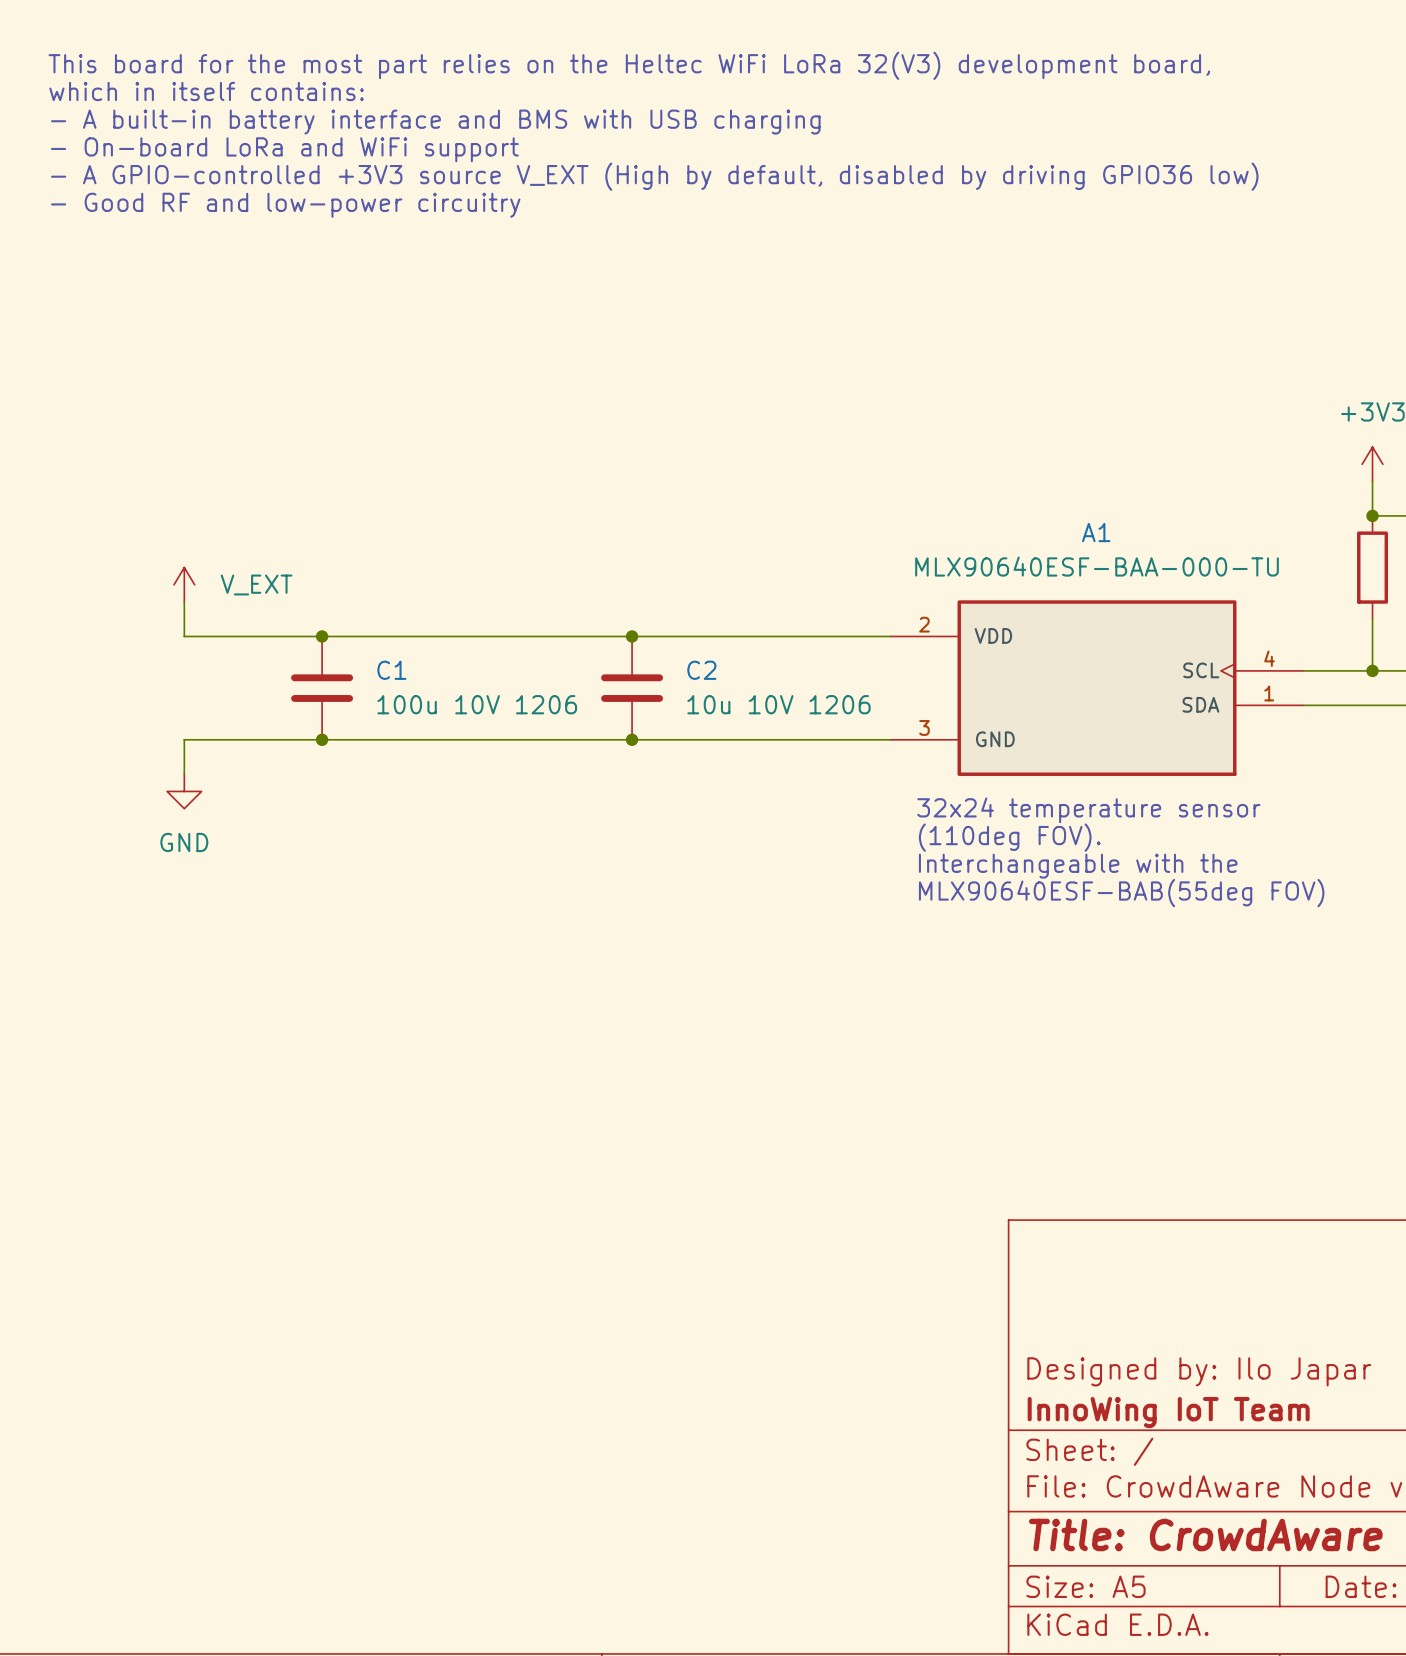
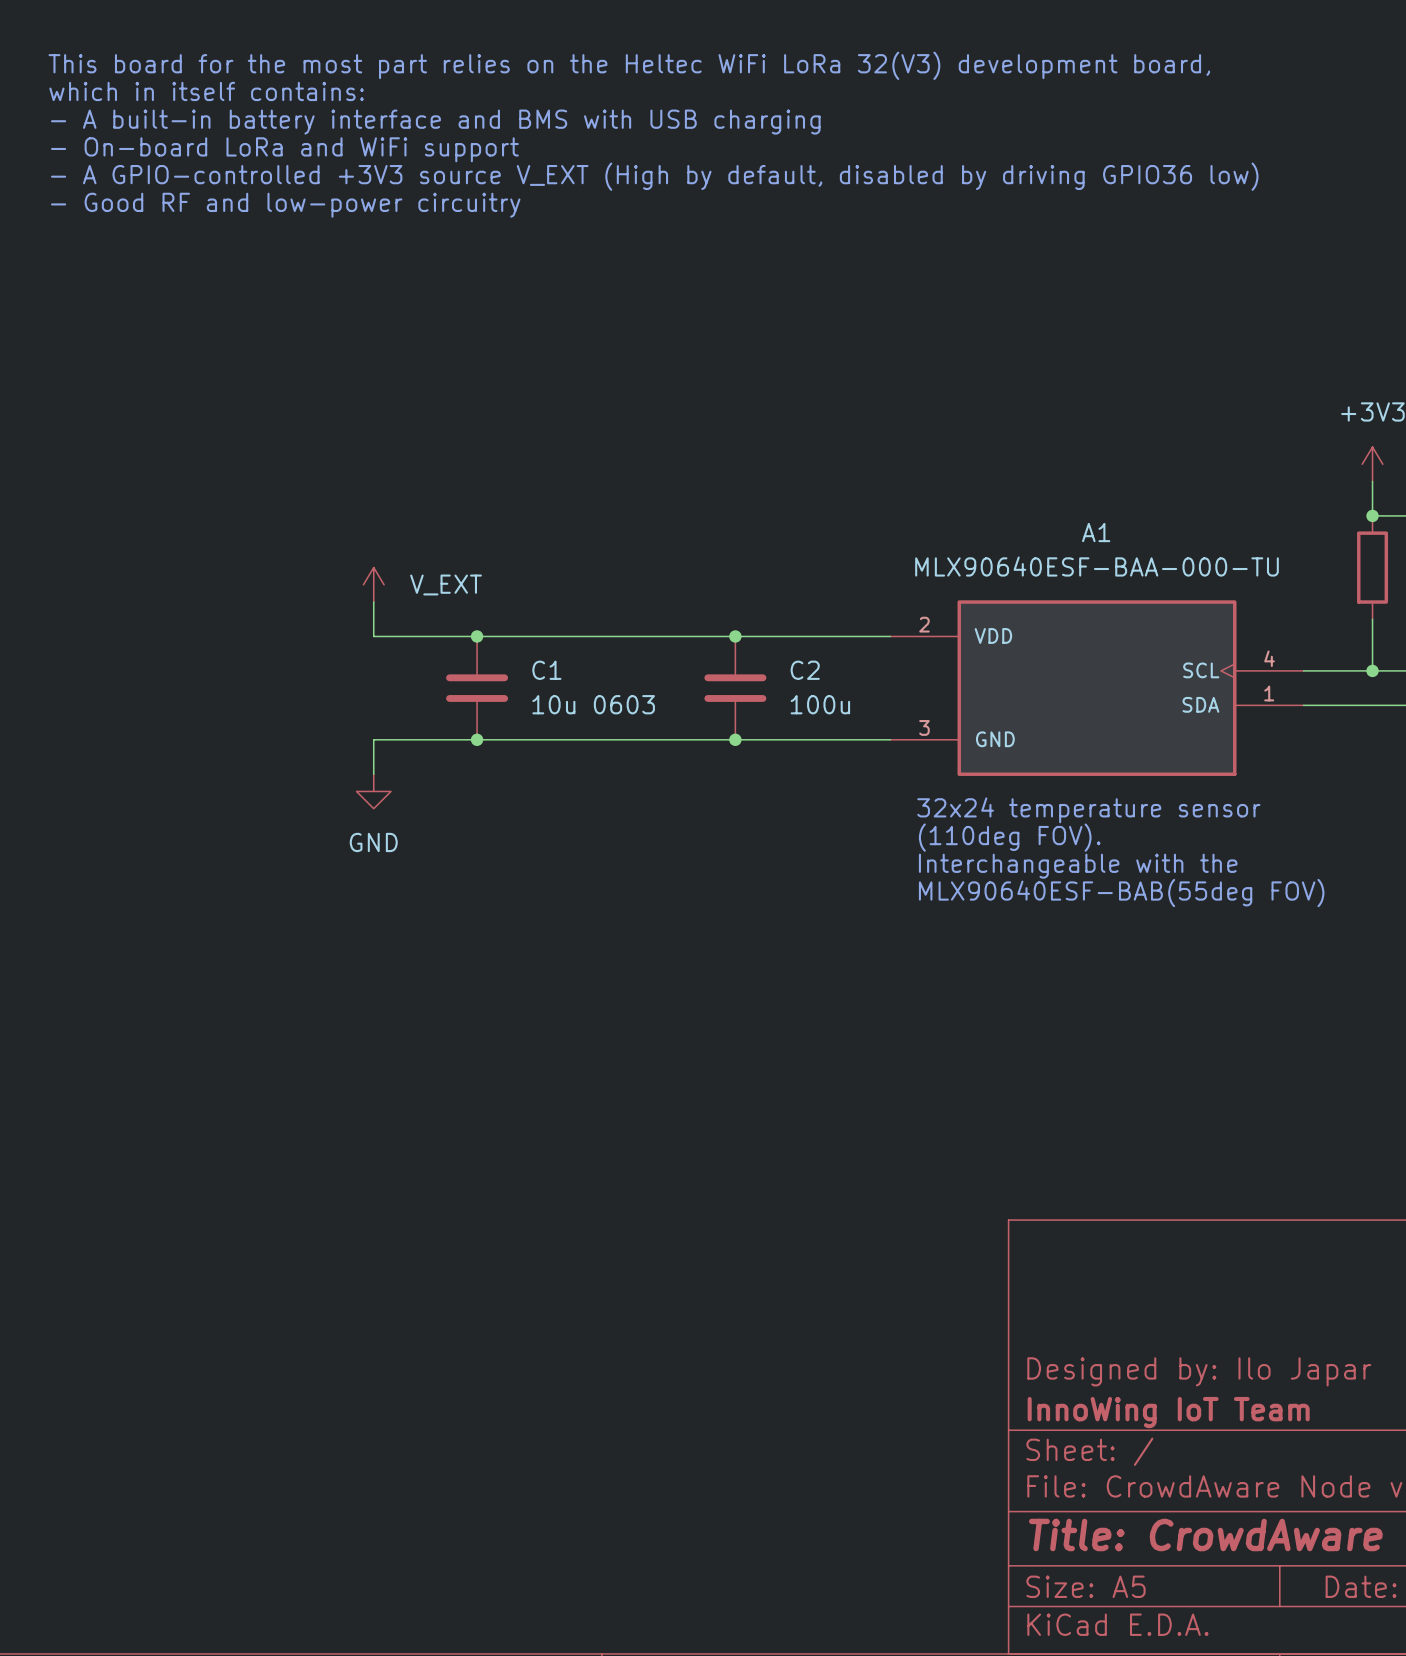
power symbol position: V_EXT (184, 584) -> V_EXT (373, 584)
wire: (184, 602) (184, 636) (373, 636) -> (373, 602) (373, 636)
junction: (322, 636) -> none
junction: none -> (477, 636)
junction: (632, 636) -> none
junction: none -> (735, 636)
C1 position: (322, 688) -> (477, 688)
C2 position: (632, 688) -> (735, 688)
C1 value: 100u 10V 1206 (477, 704) -> 10u 0603 (593, 704)
C2 value: 10u 10V 1206 (778, 704) -> 100u (820, 704)
junction: (322, 739) -> none
wire: (373, 739) (184, 739) (184, 774) -> (373, 739) (373, 774)
junction: none -> (477, 739)
junction: (632, 739) -> none
junction: none -> (735, 739)
power symbol position: GND (184, 791) -> GND (373, 791)

